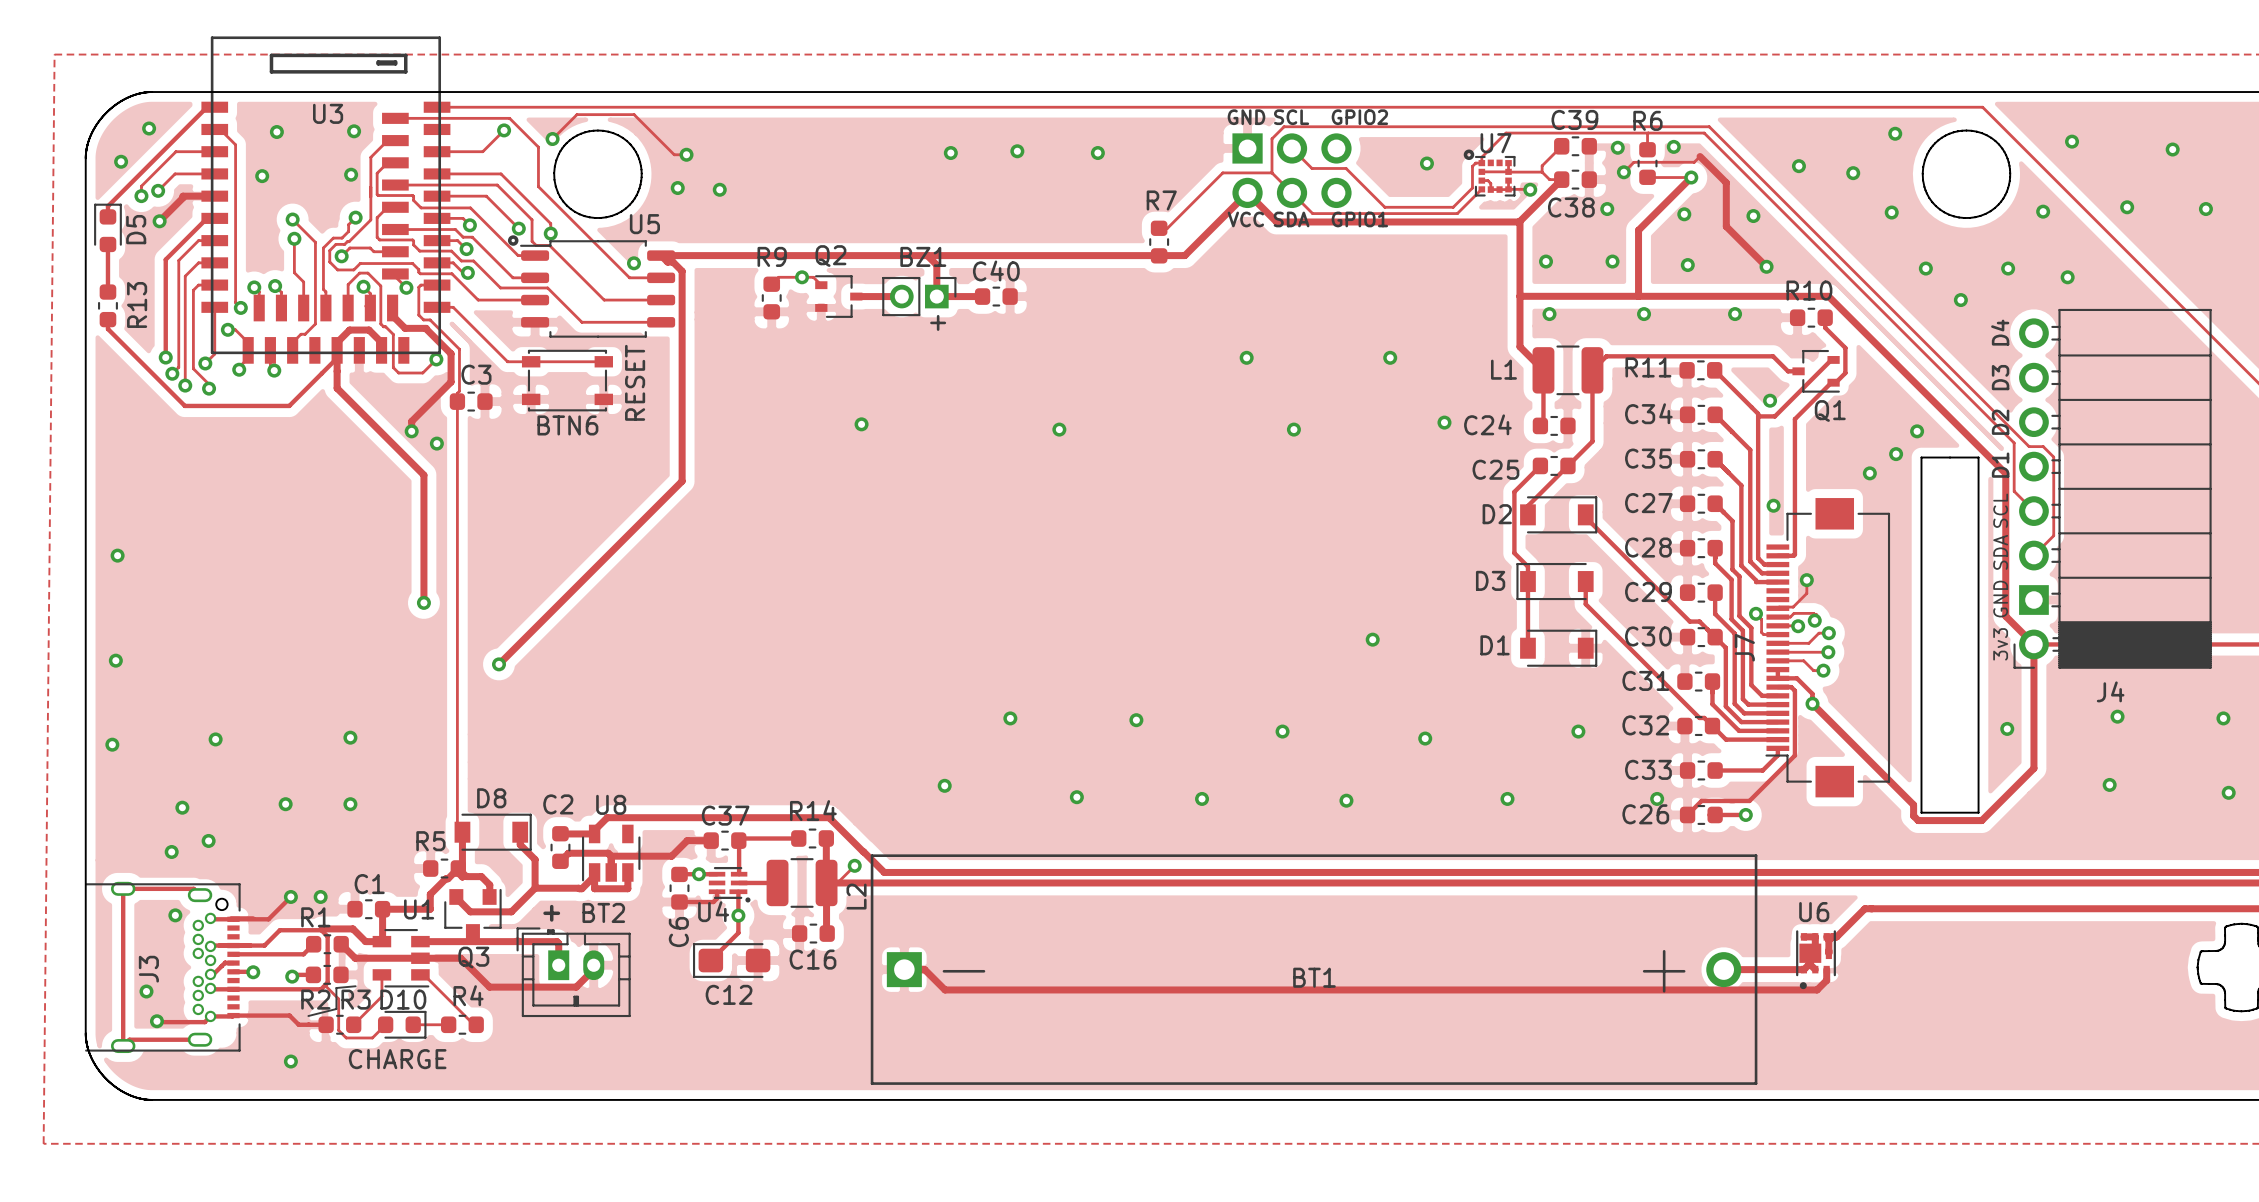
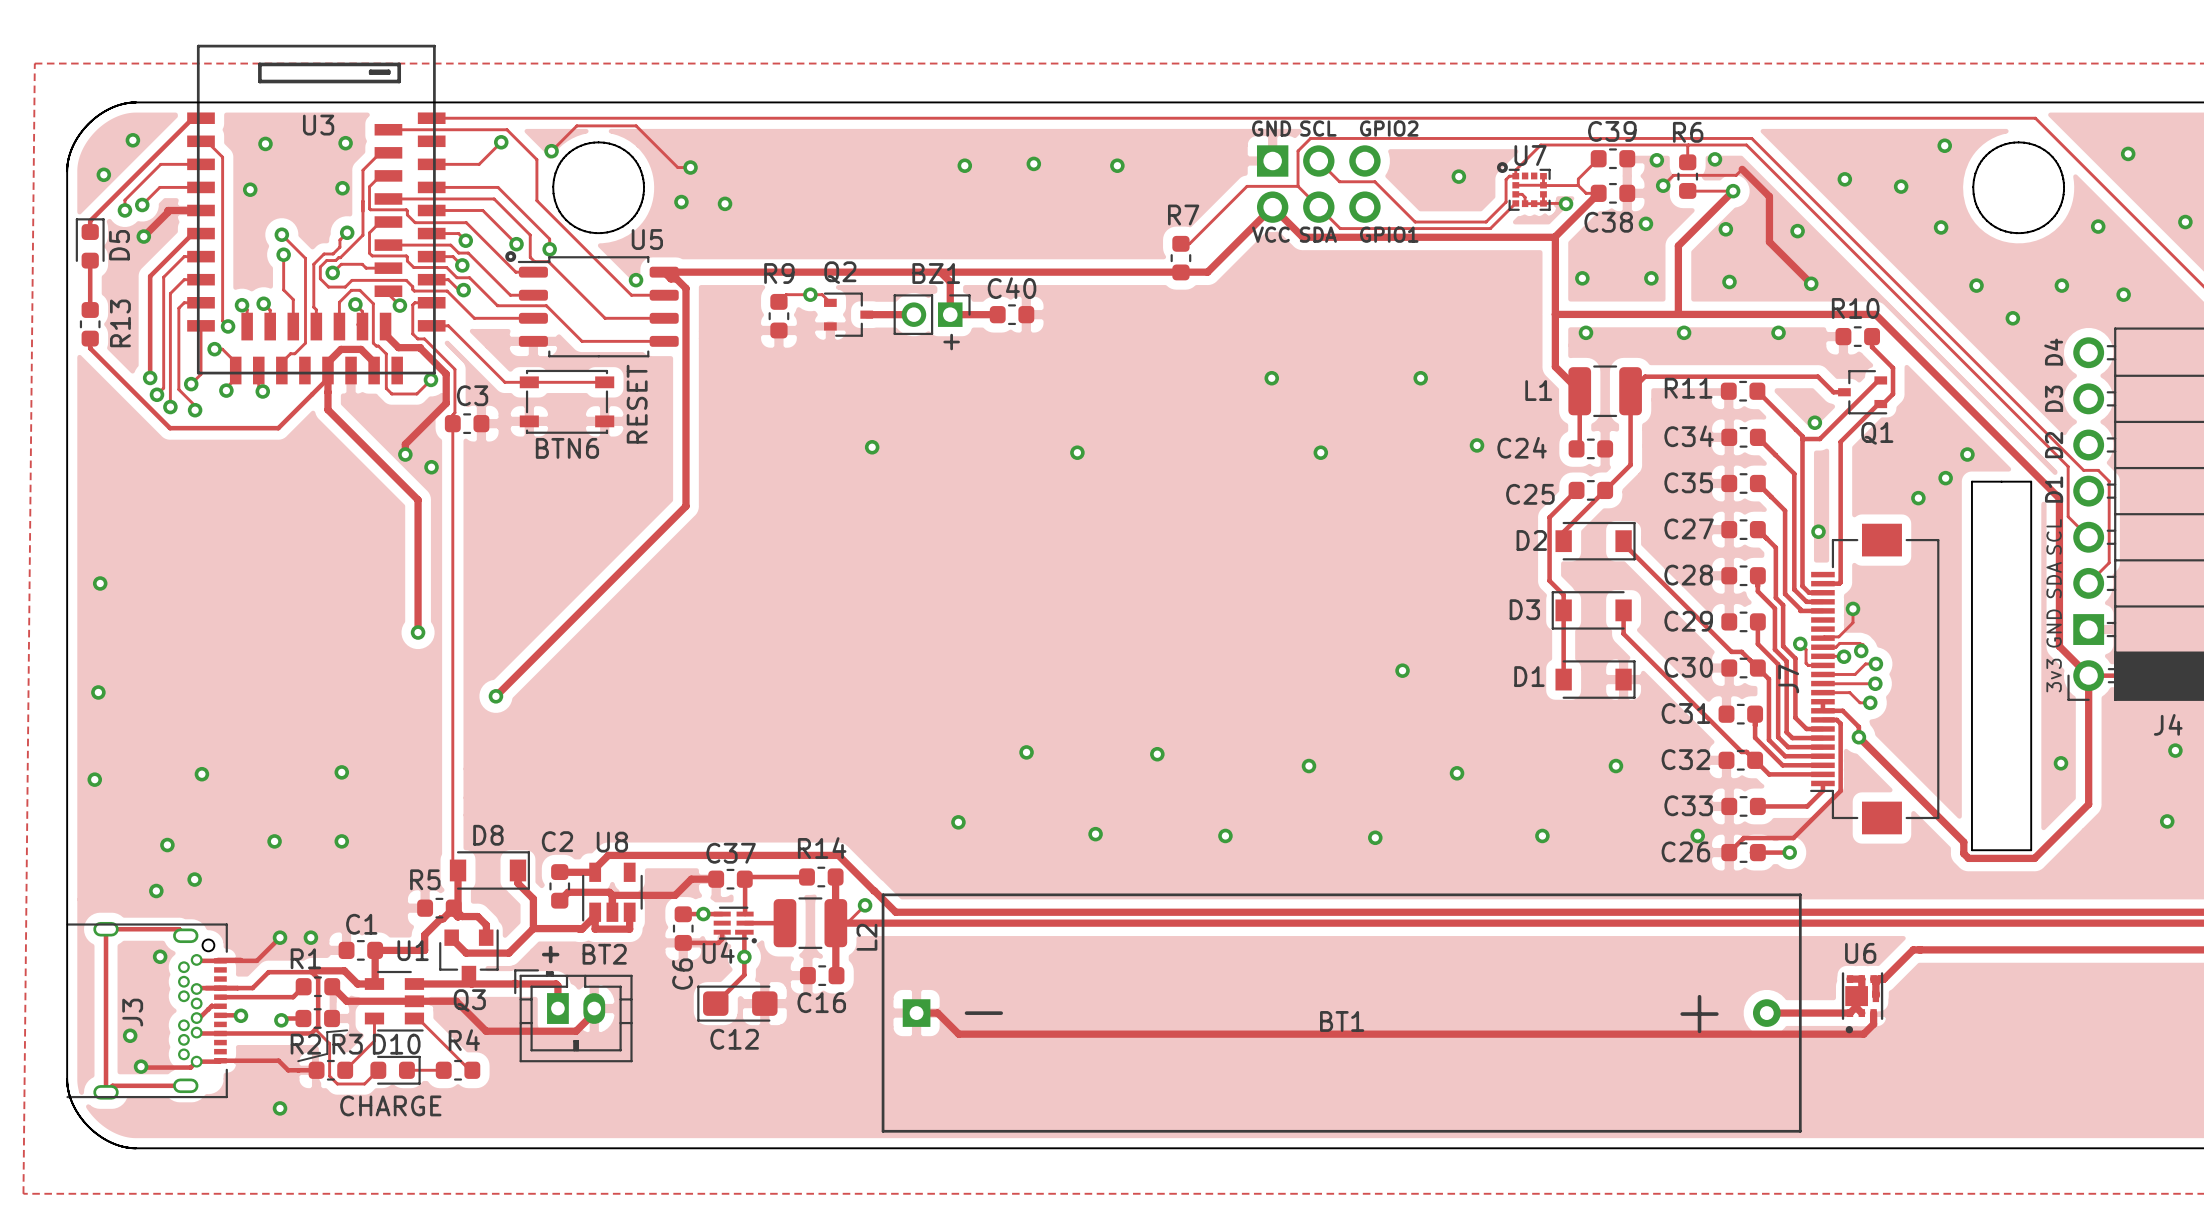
BT1 footprint: [870, 854, 1758, 1085] -> [881, 893, 1802, 1133]
text: none -> - (983, 1013)
text: none -> + (1699, 1014)

